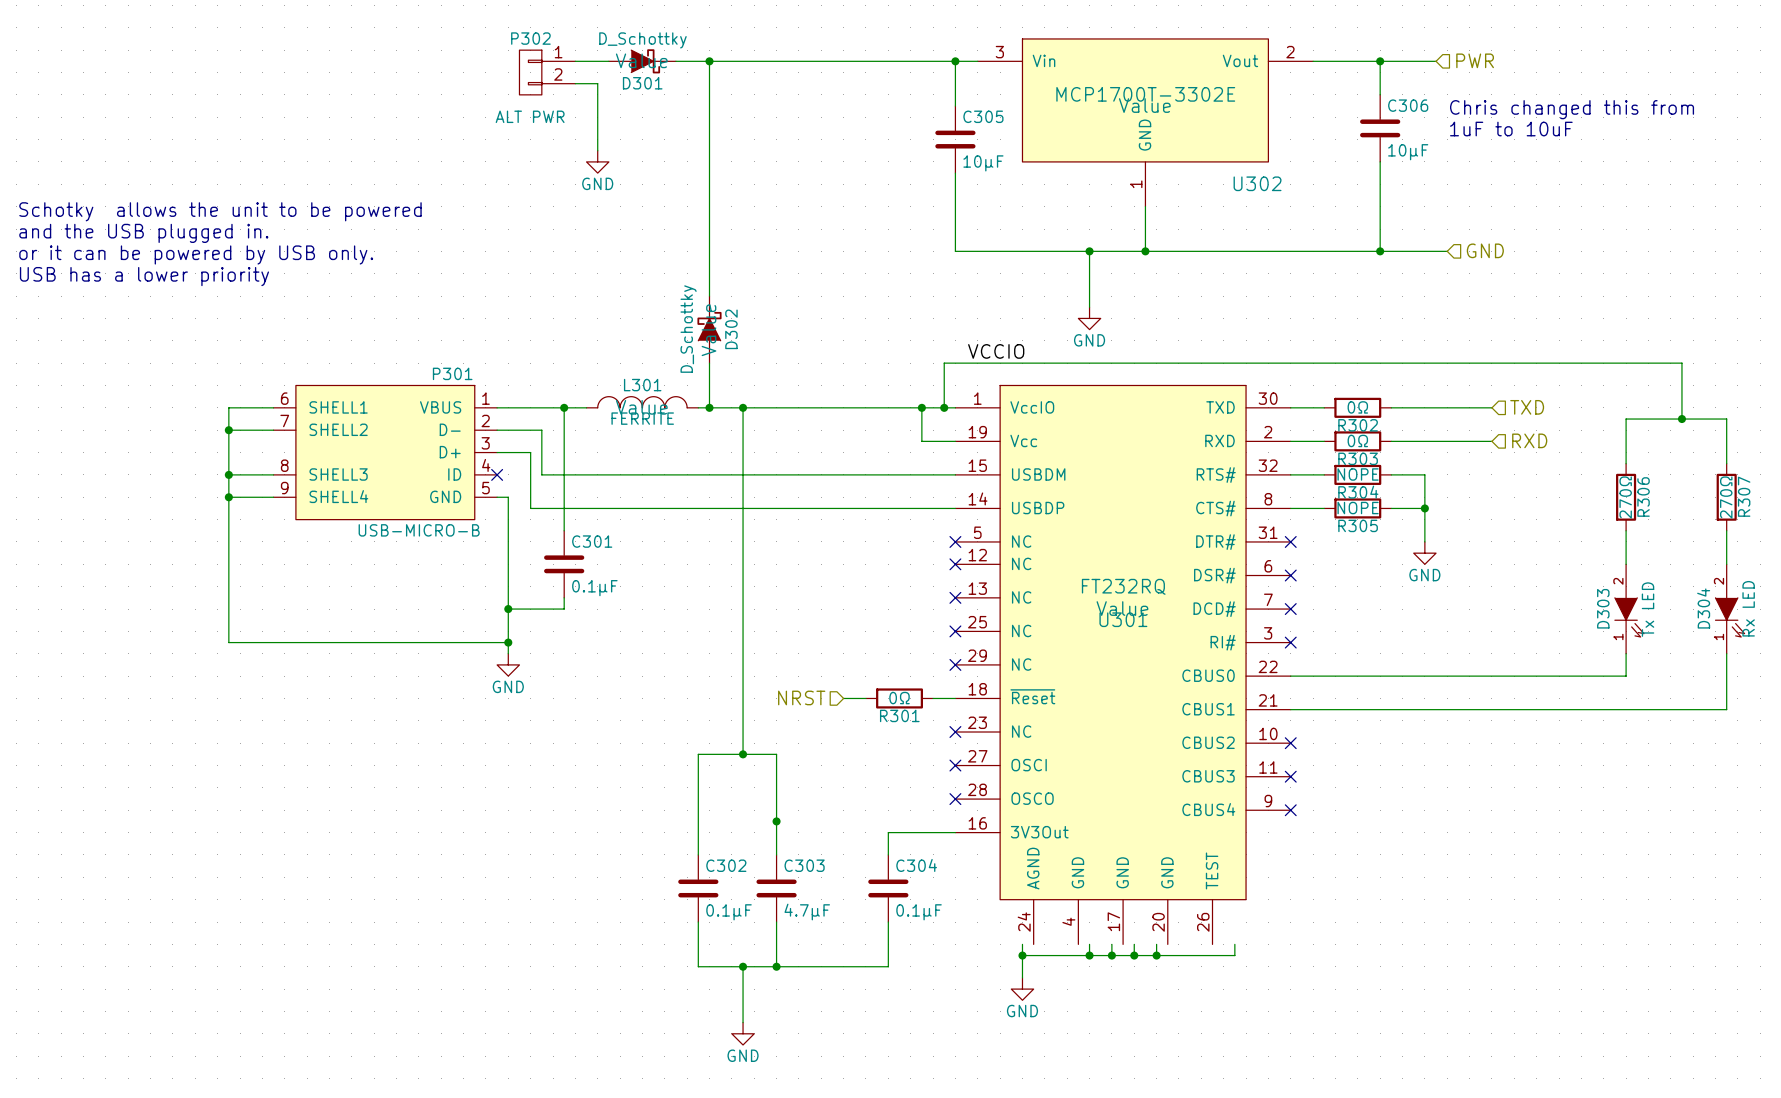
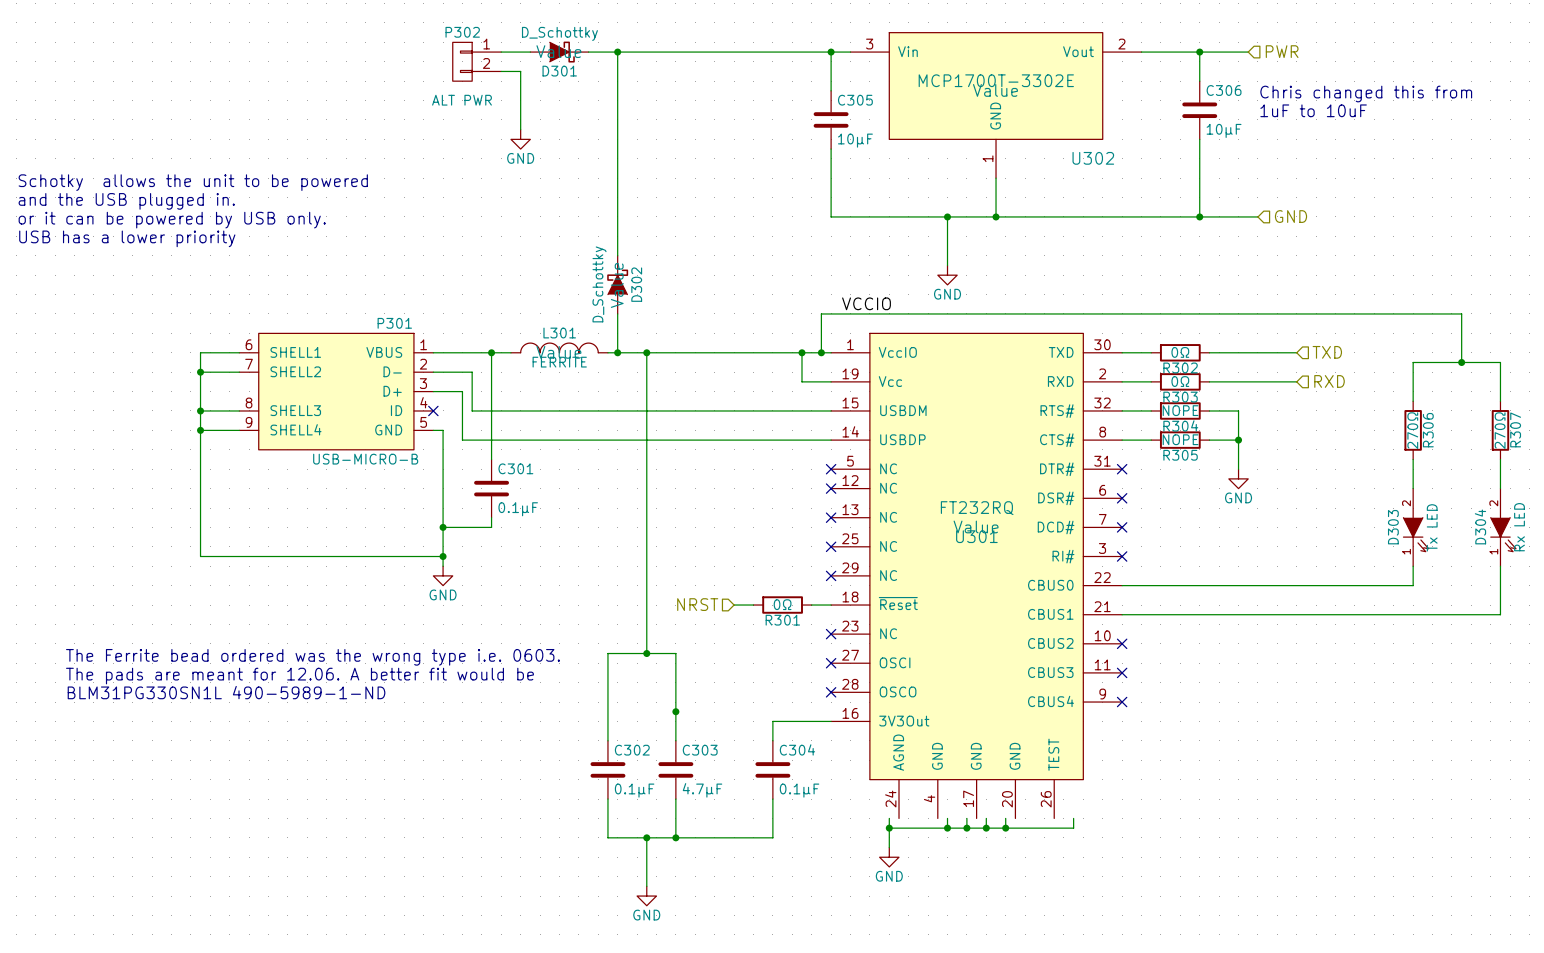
text: none -> The Ferrite bead ordered was the wrong type i.e. 0603. (312, 657)
text: none -> The pads are meant for 12.06. A better fit would be (299, 676)
text: none -> BLM31PG330SN1L 490-5989-1-ND (226, 692)

